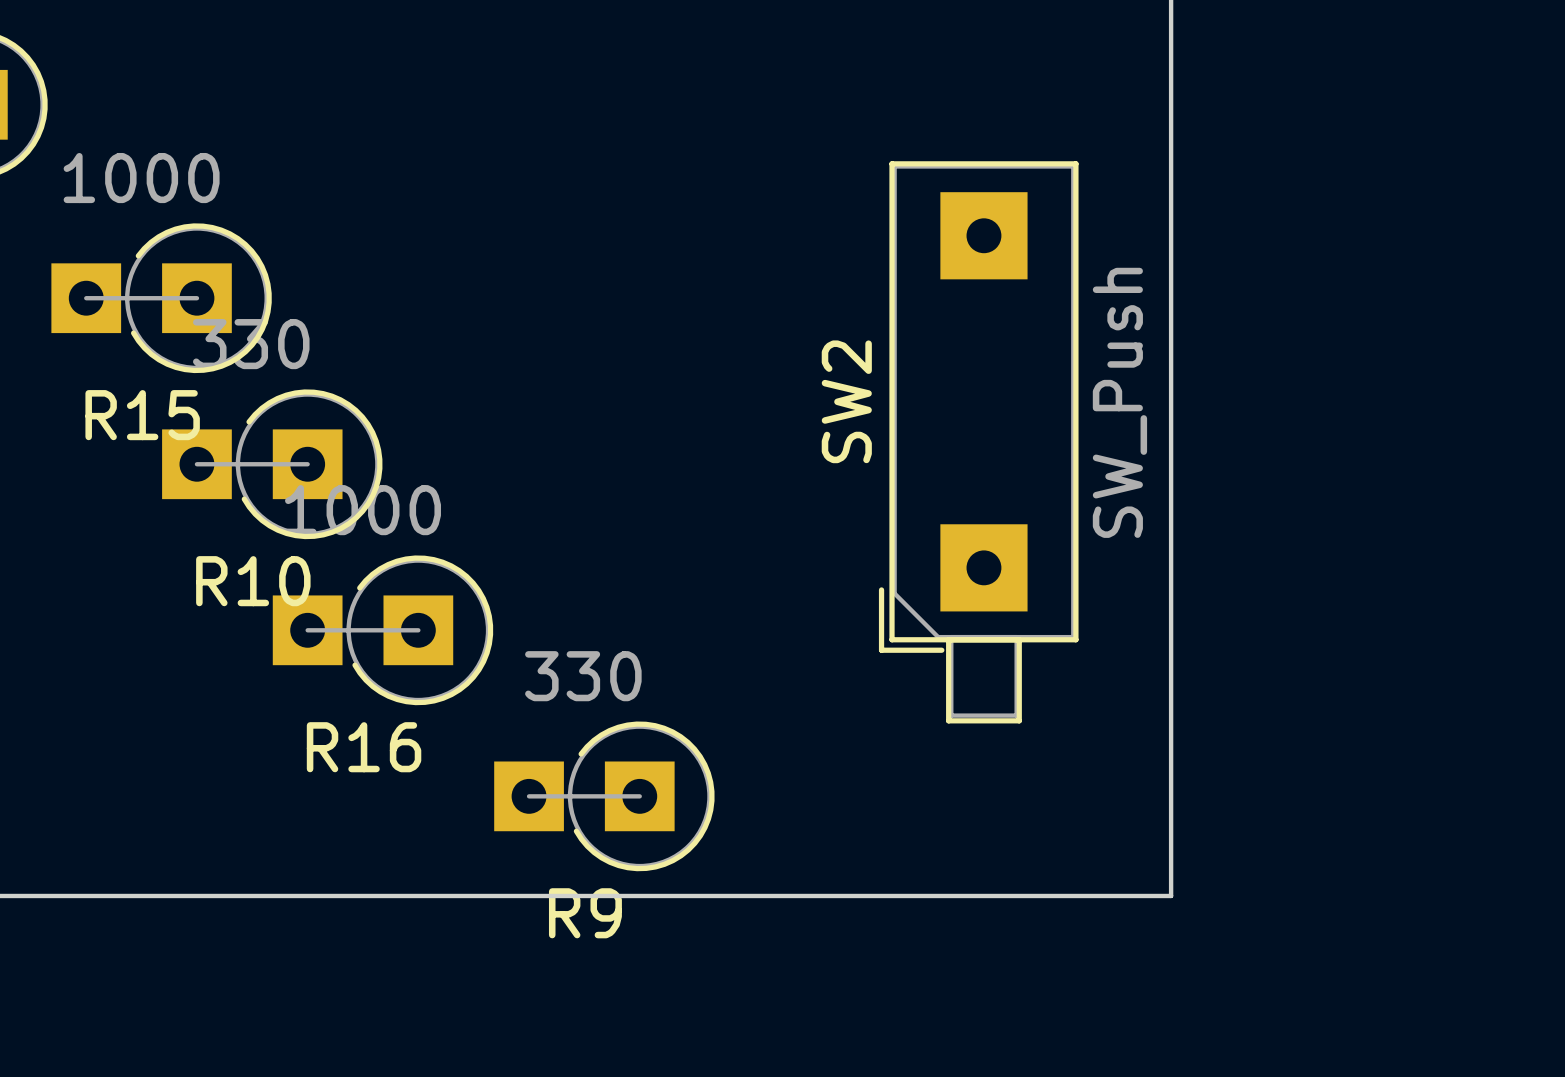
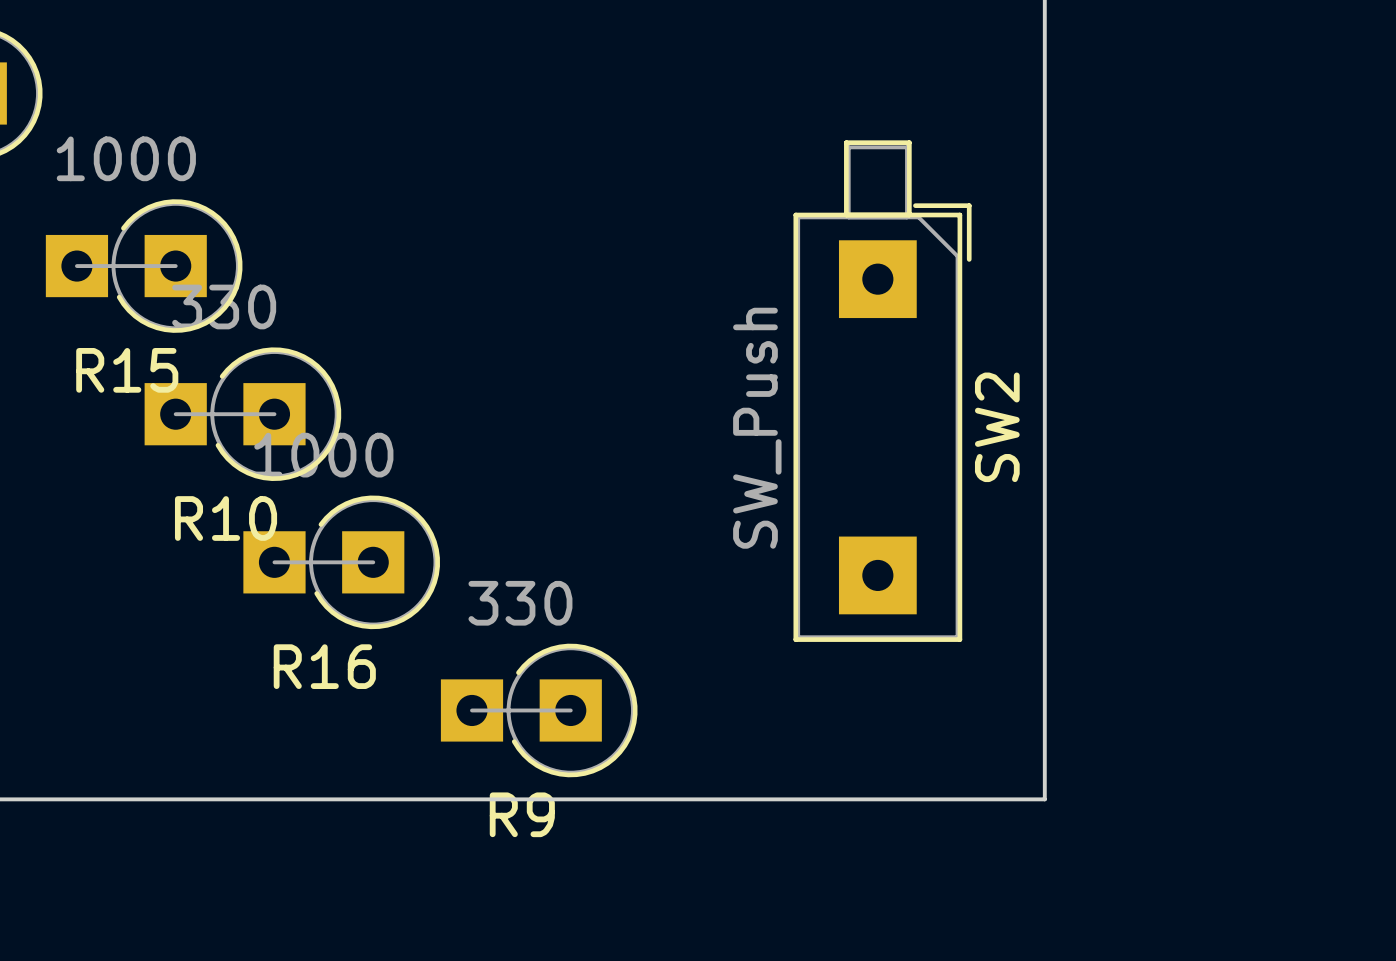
SW2 rotation: 0° (978, 442) -> 180° (882, 391)

